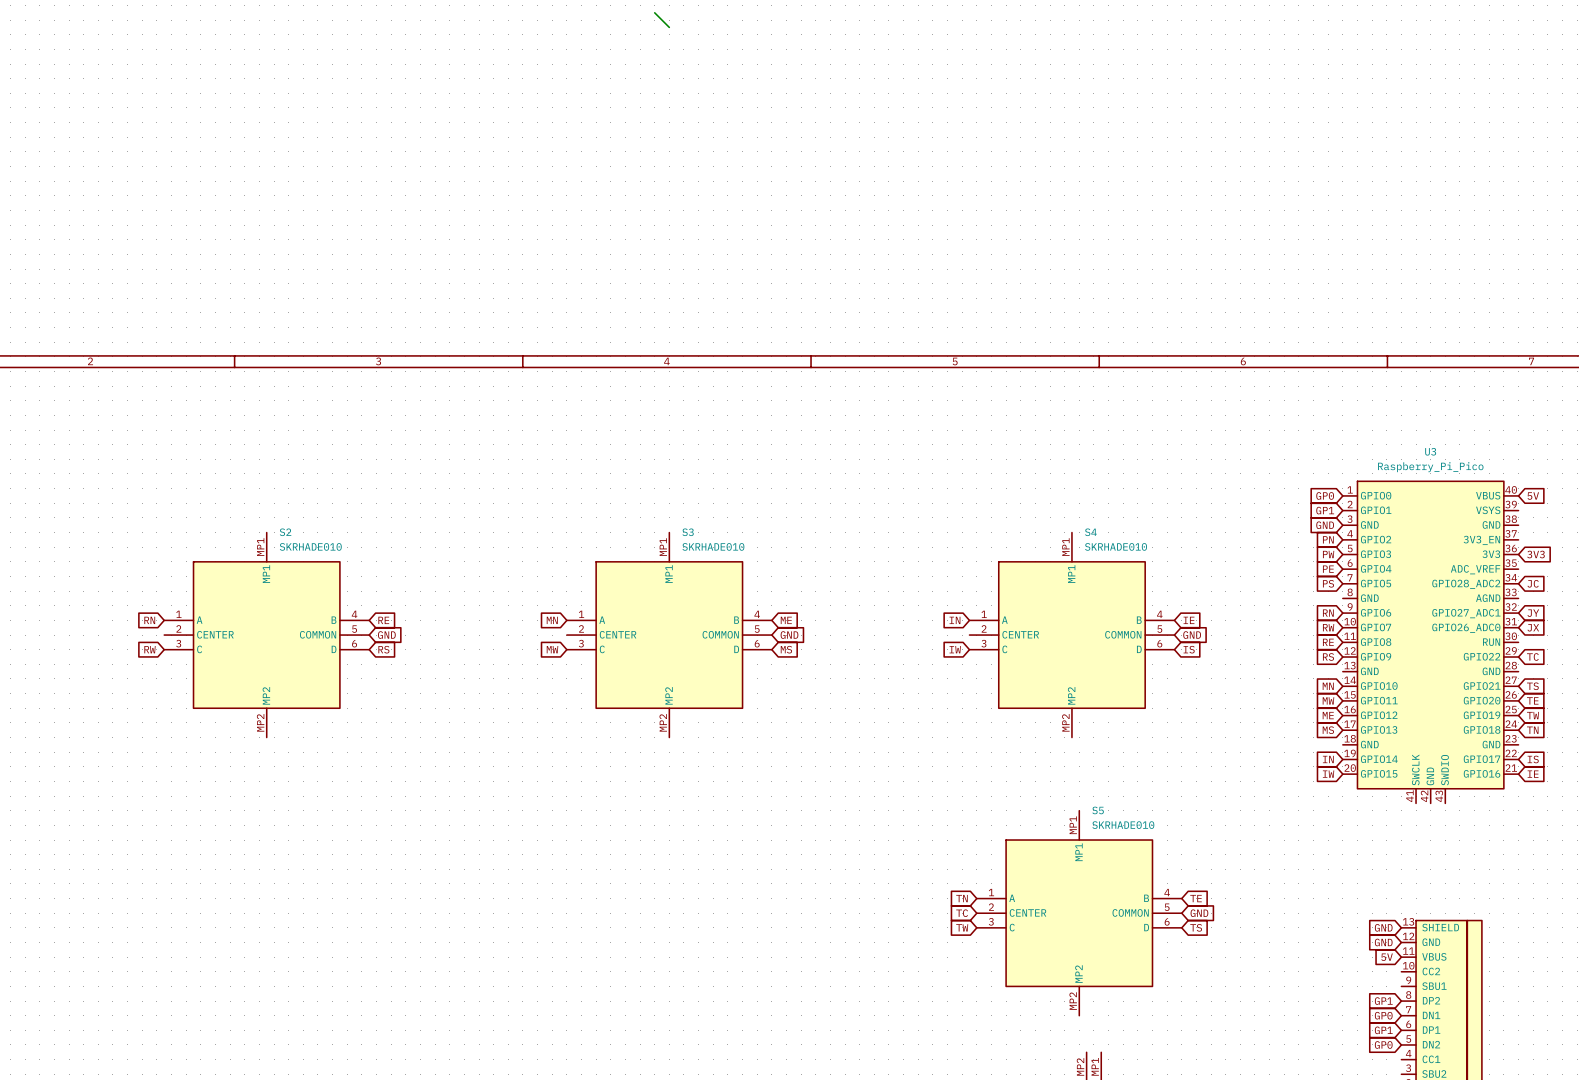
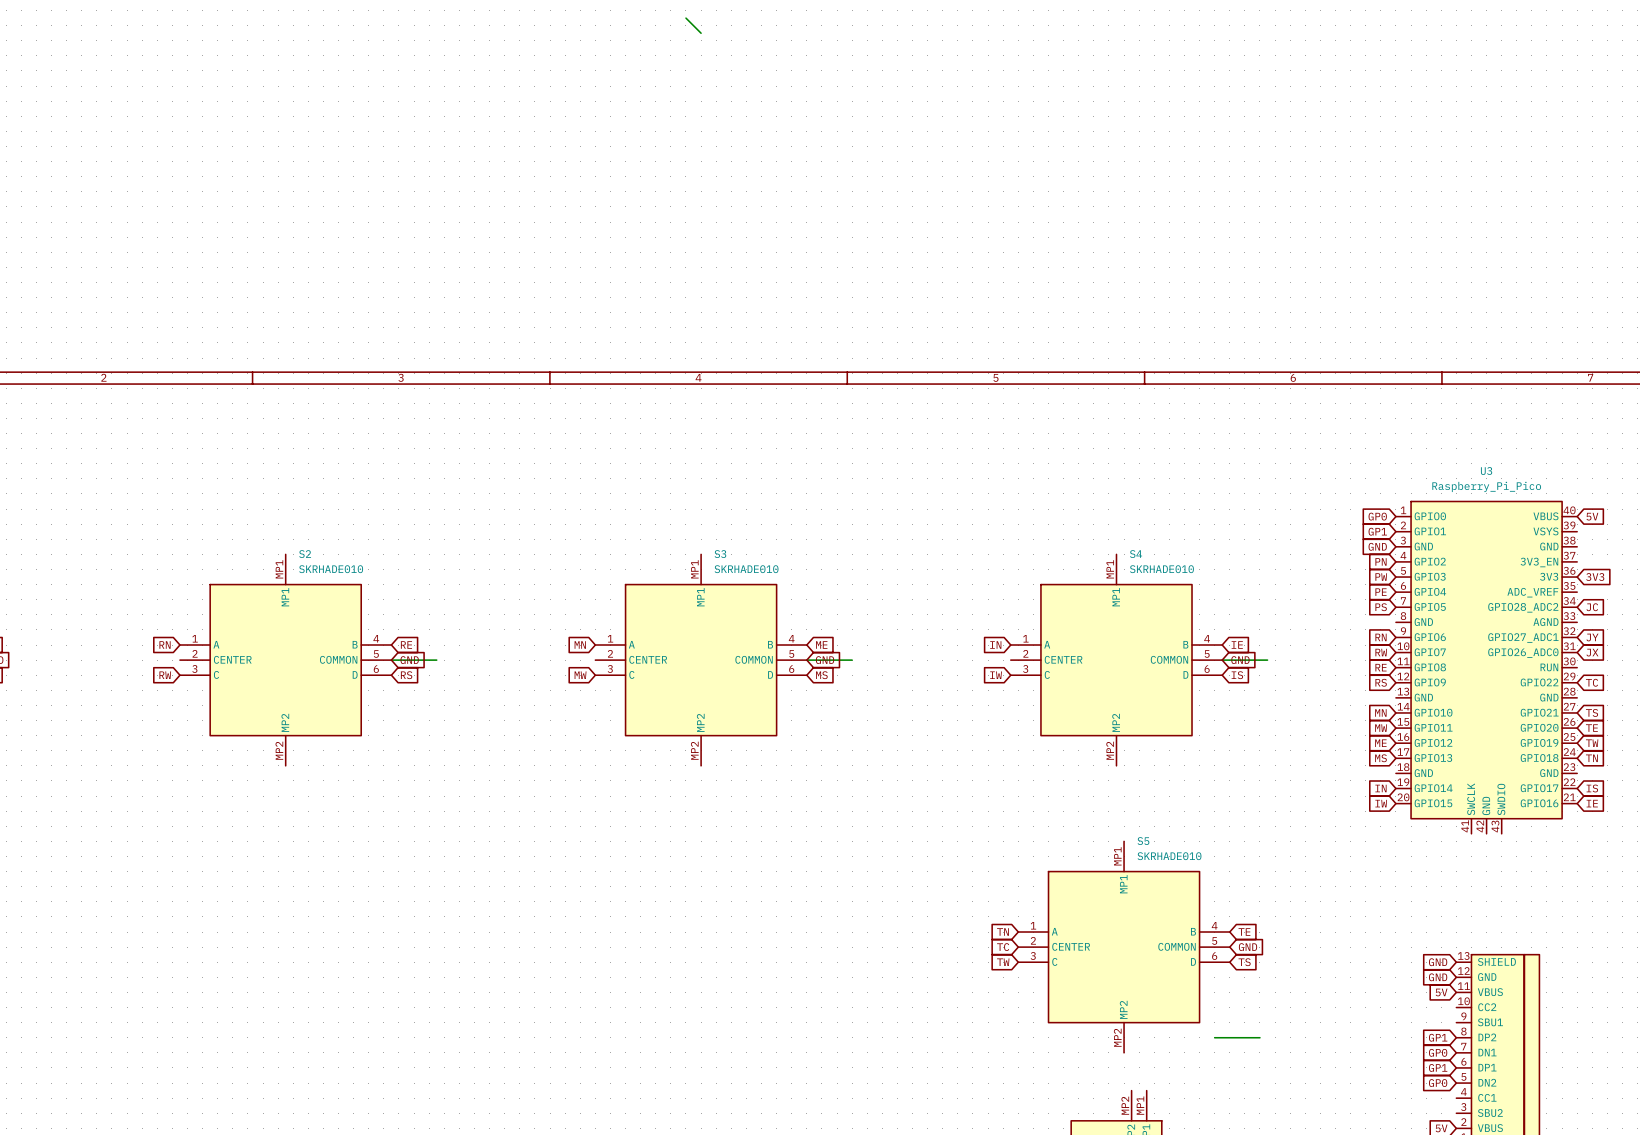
wire: none -> (391, 660) (436, 660)
wire: none -> (806, 660) (852, 660)
wire: none -> (1222, 660) (1267, 660)
wire: none -> (1214, 1037) (1259, 1037)

